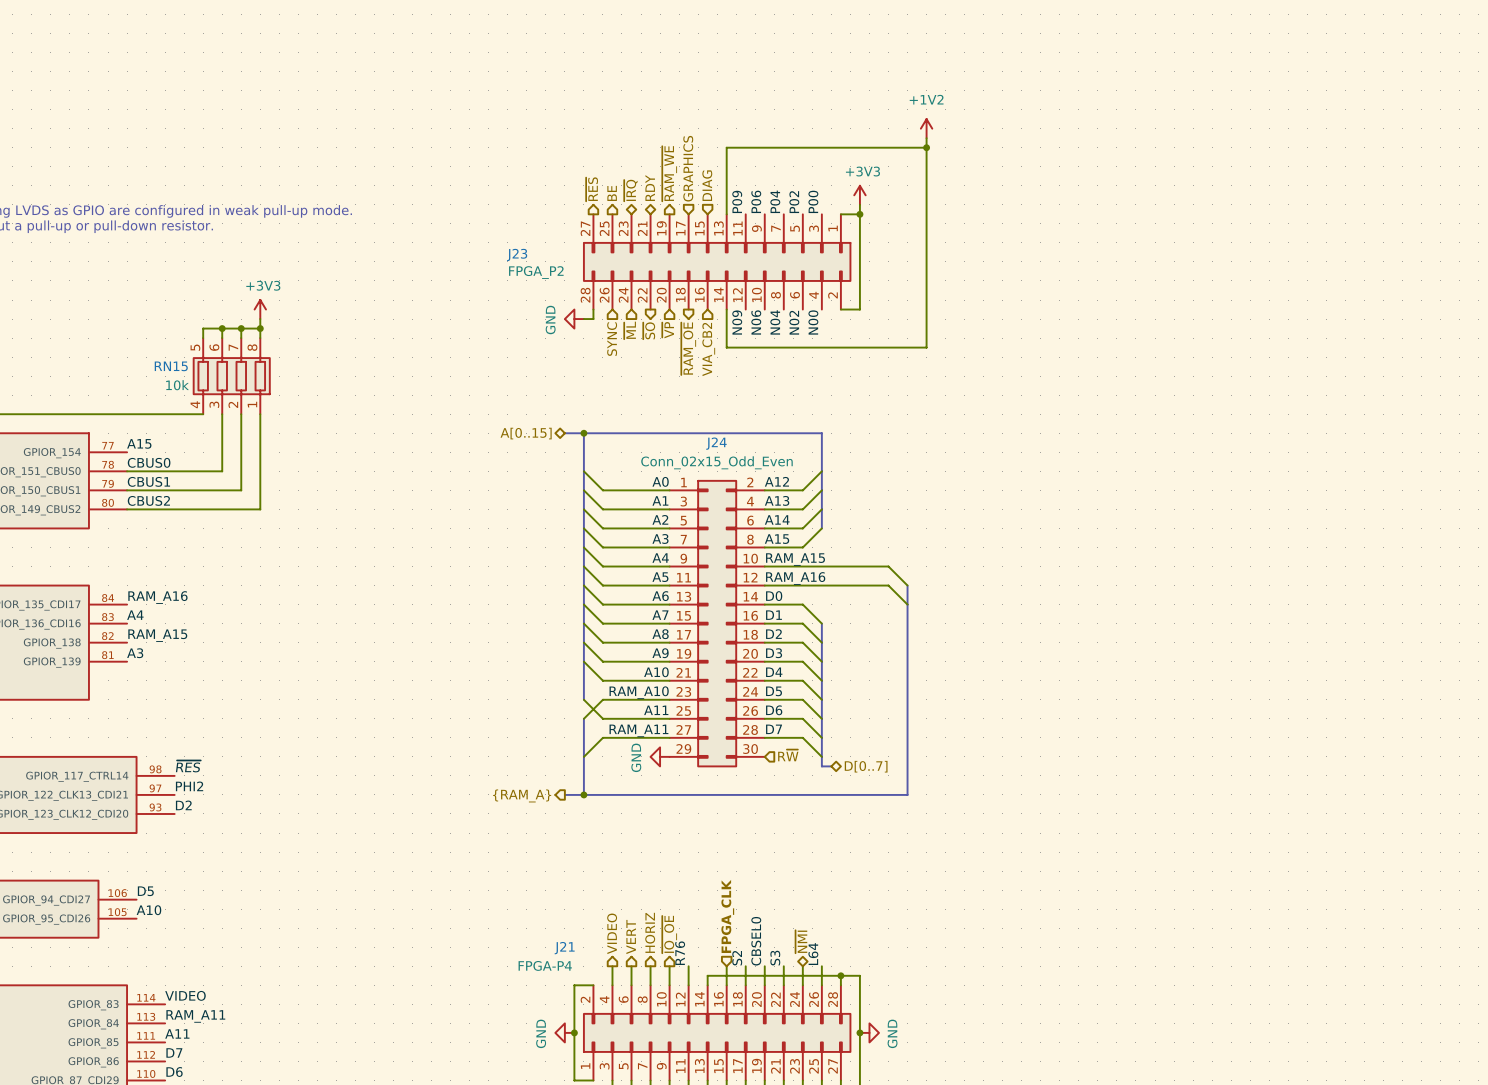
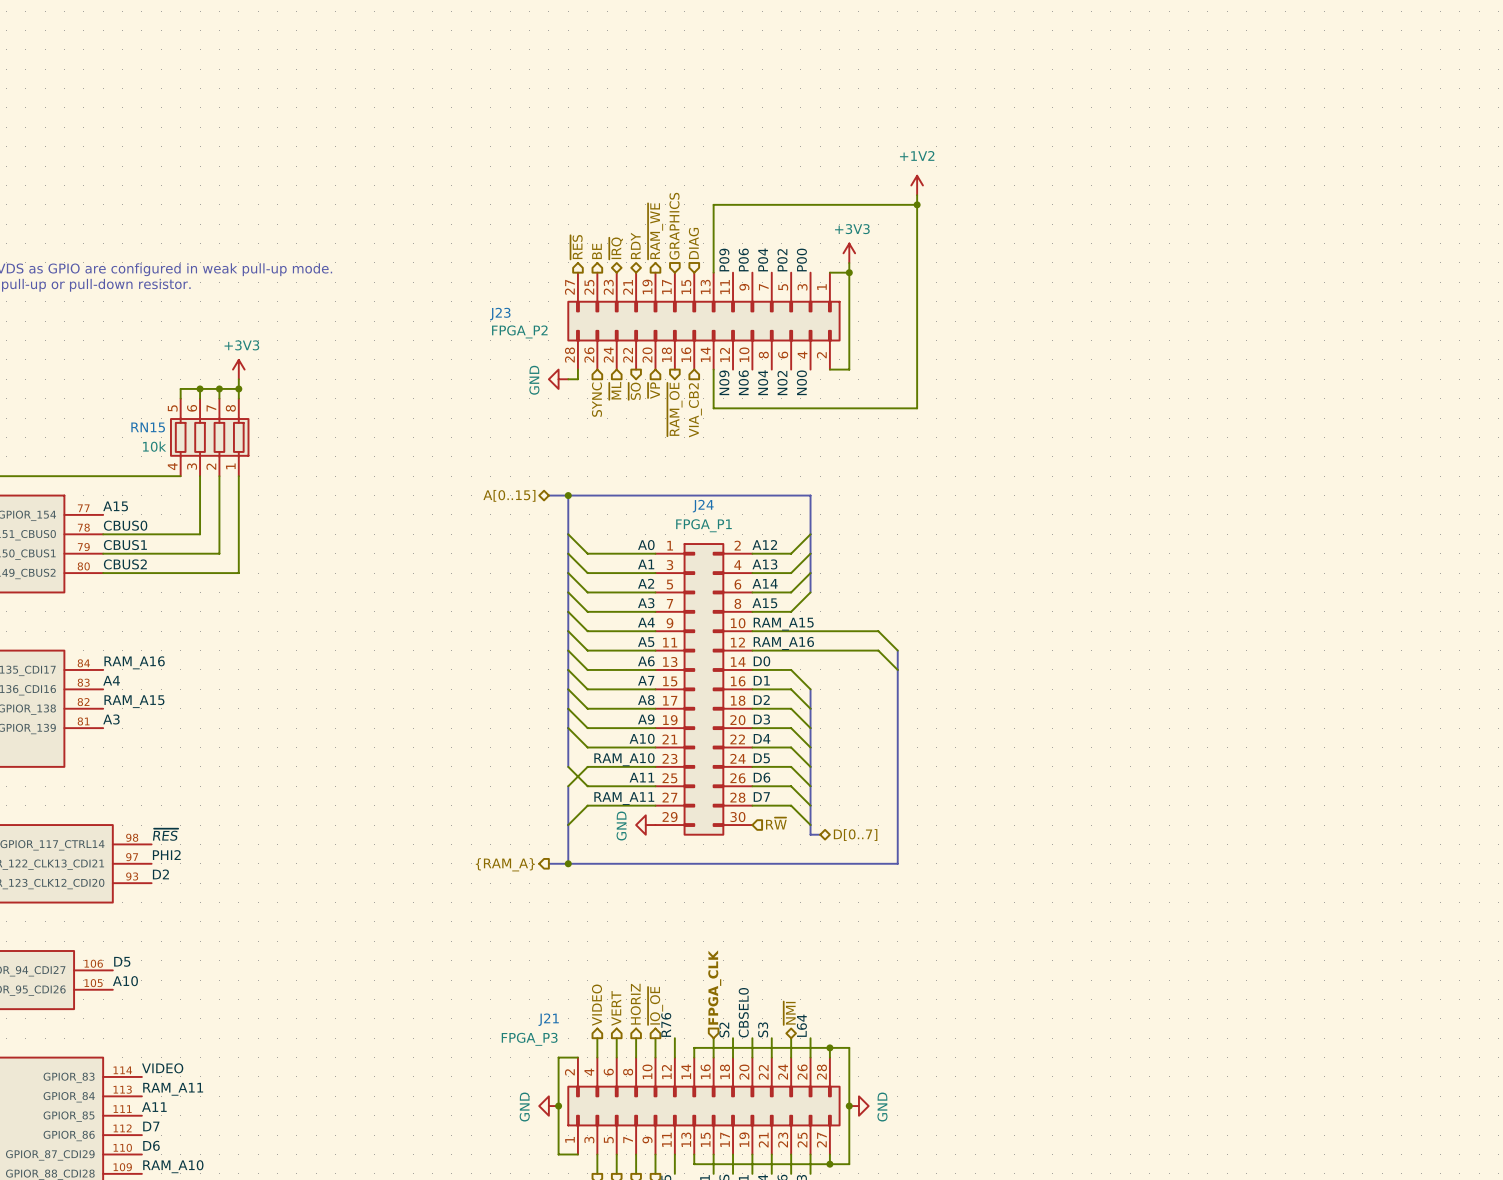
J24 value: Conn_02x15_Odd_Even (716, 462) -> FPGA_P1 (703, 525)
J21 value: FPGA-P4 (545, 965) -> FPGA_P3 (529, 1039)

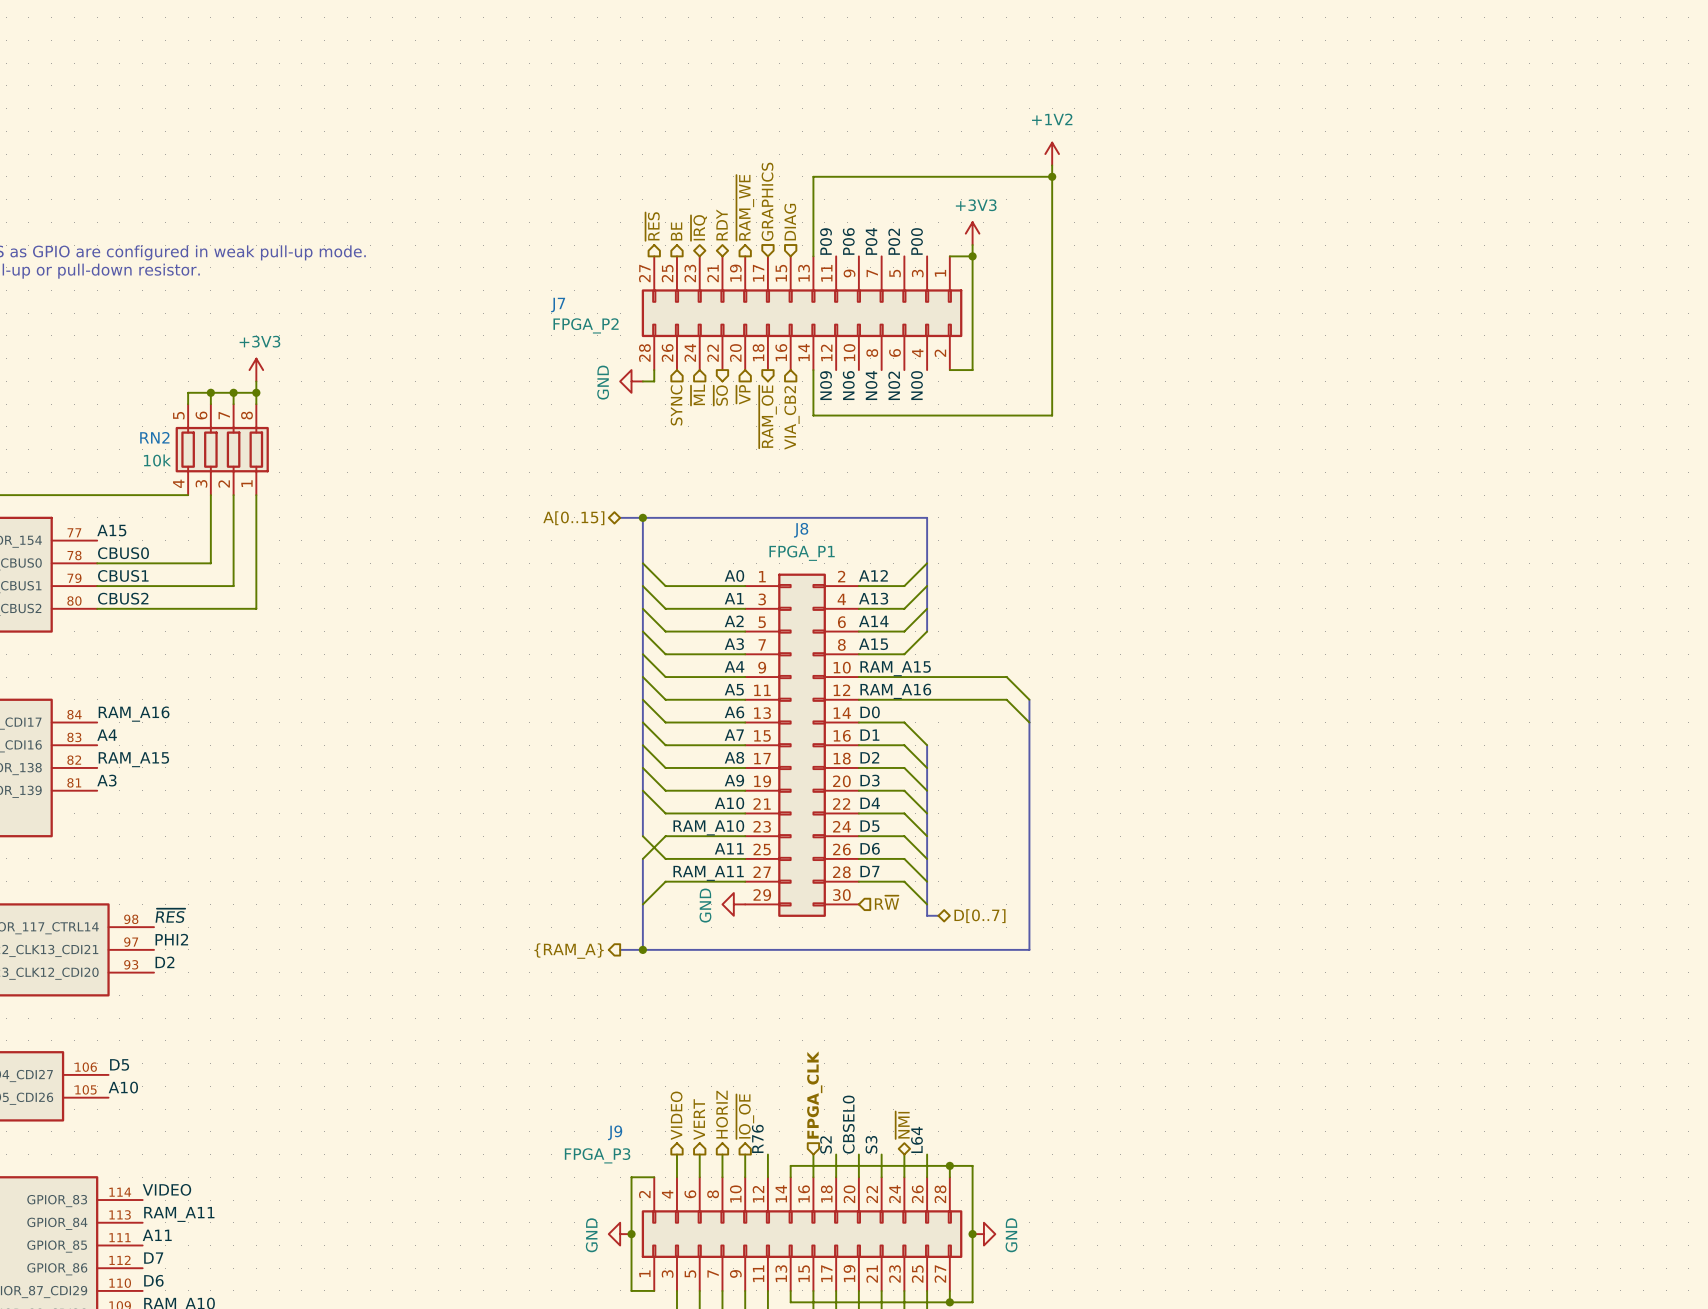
J23 name: J23 (500, 314) -> J7 (558, 305)
RN15 name: RN15 (148, 427) -> RN2 (154, 437)
J24 name: J24 (703, 506) -> J8 (801, 530)
J21 name: J21 (548, 1019) -> J9 (615, 1132)

